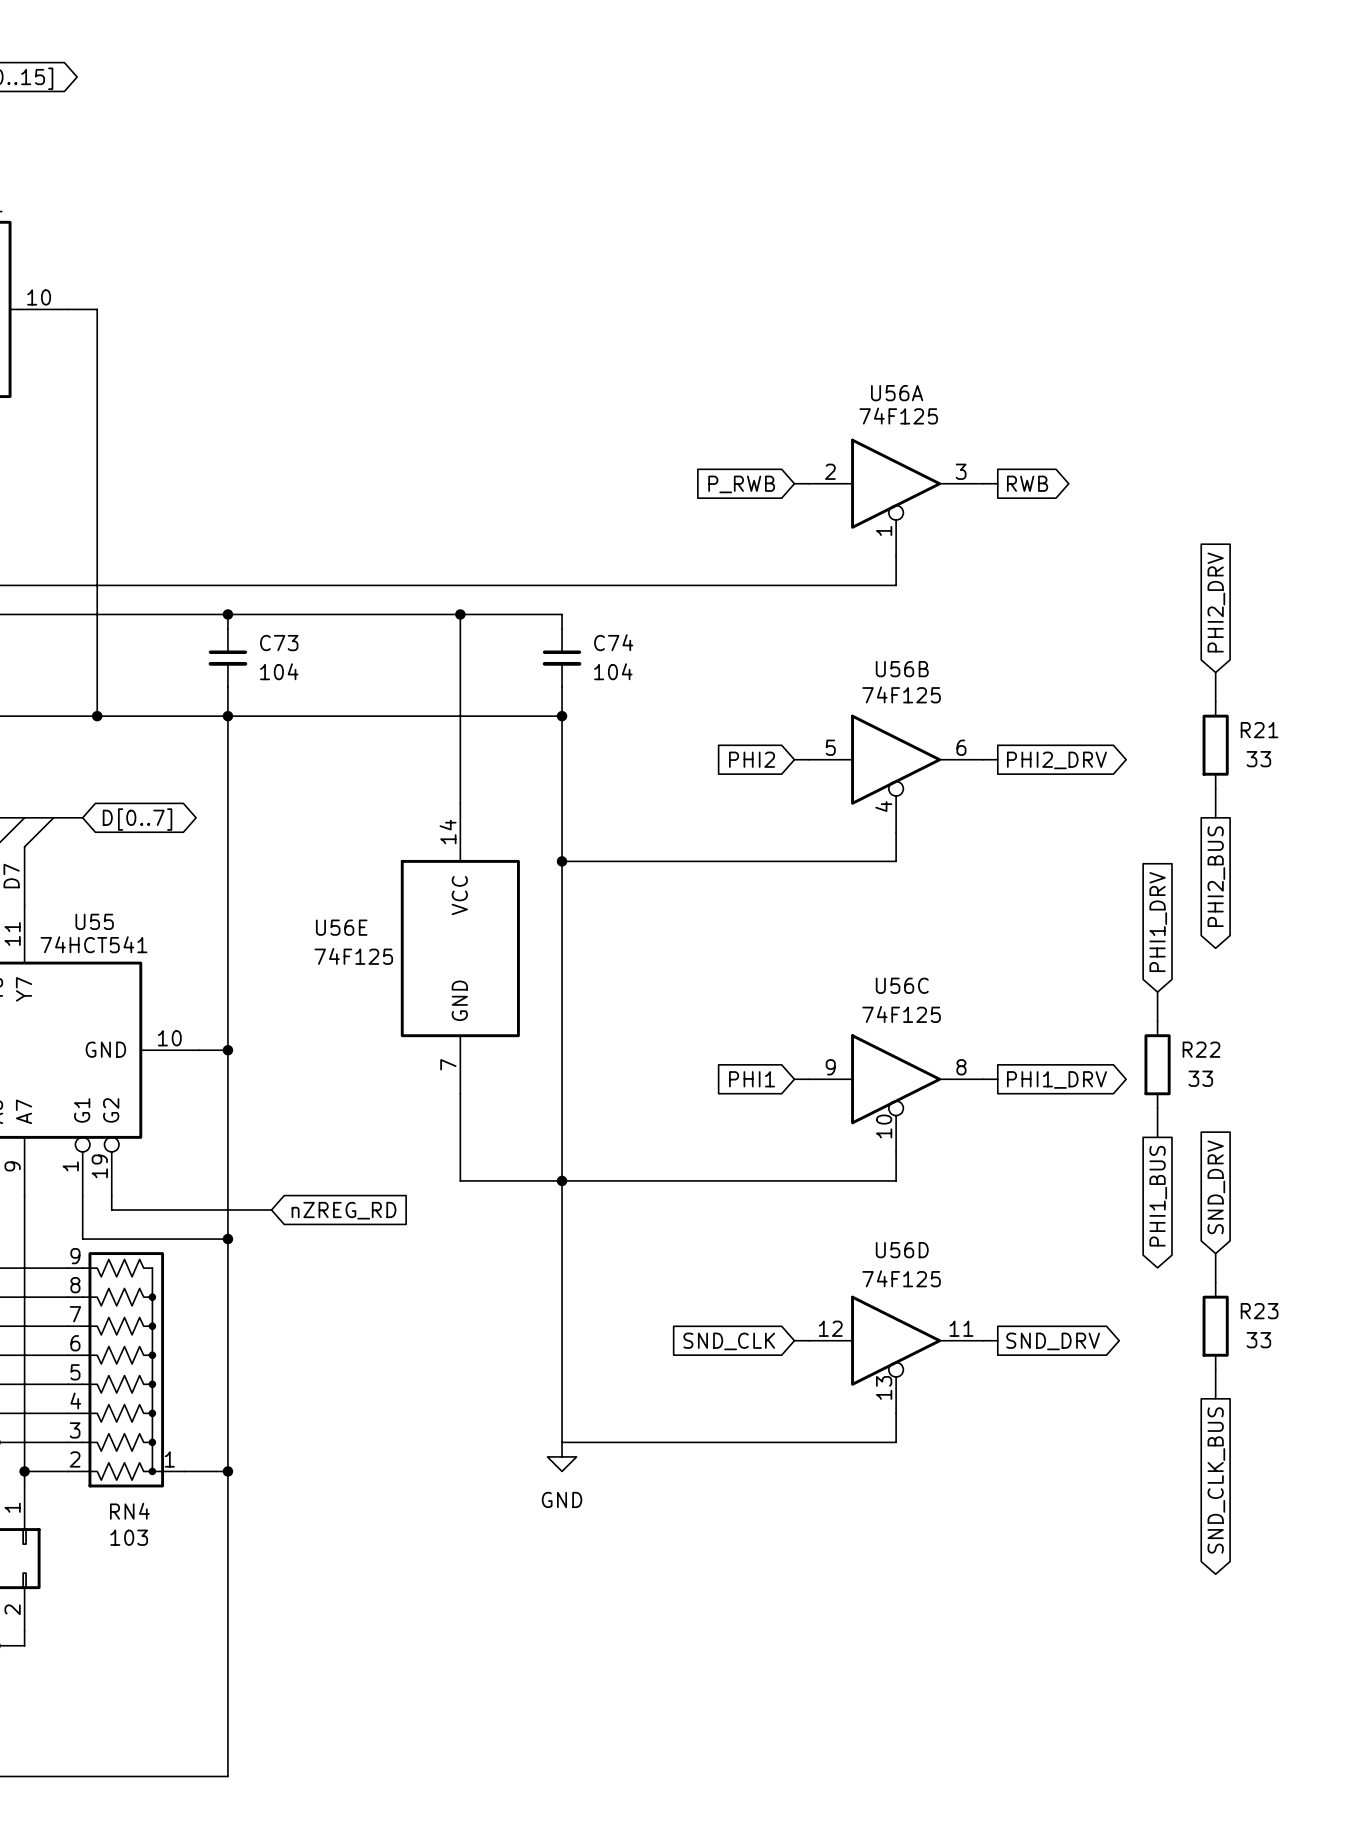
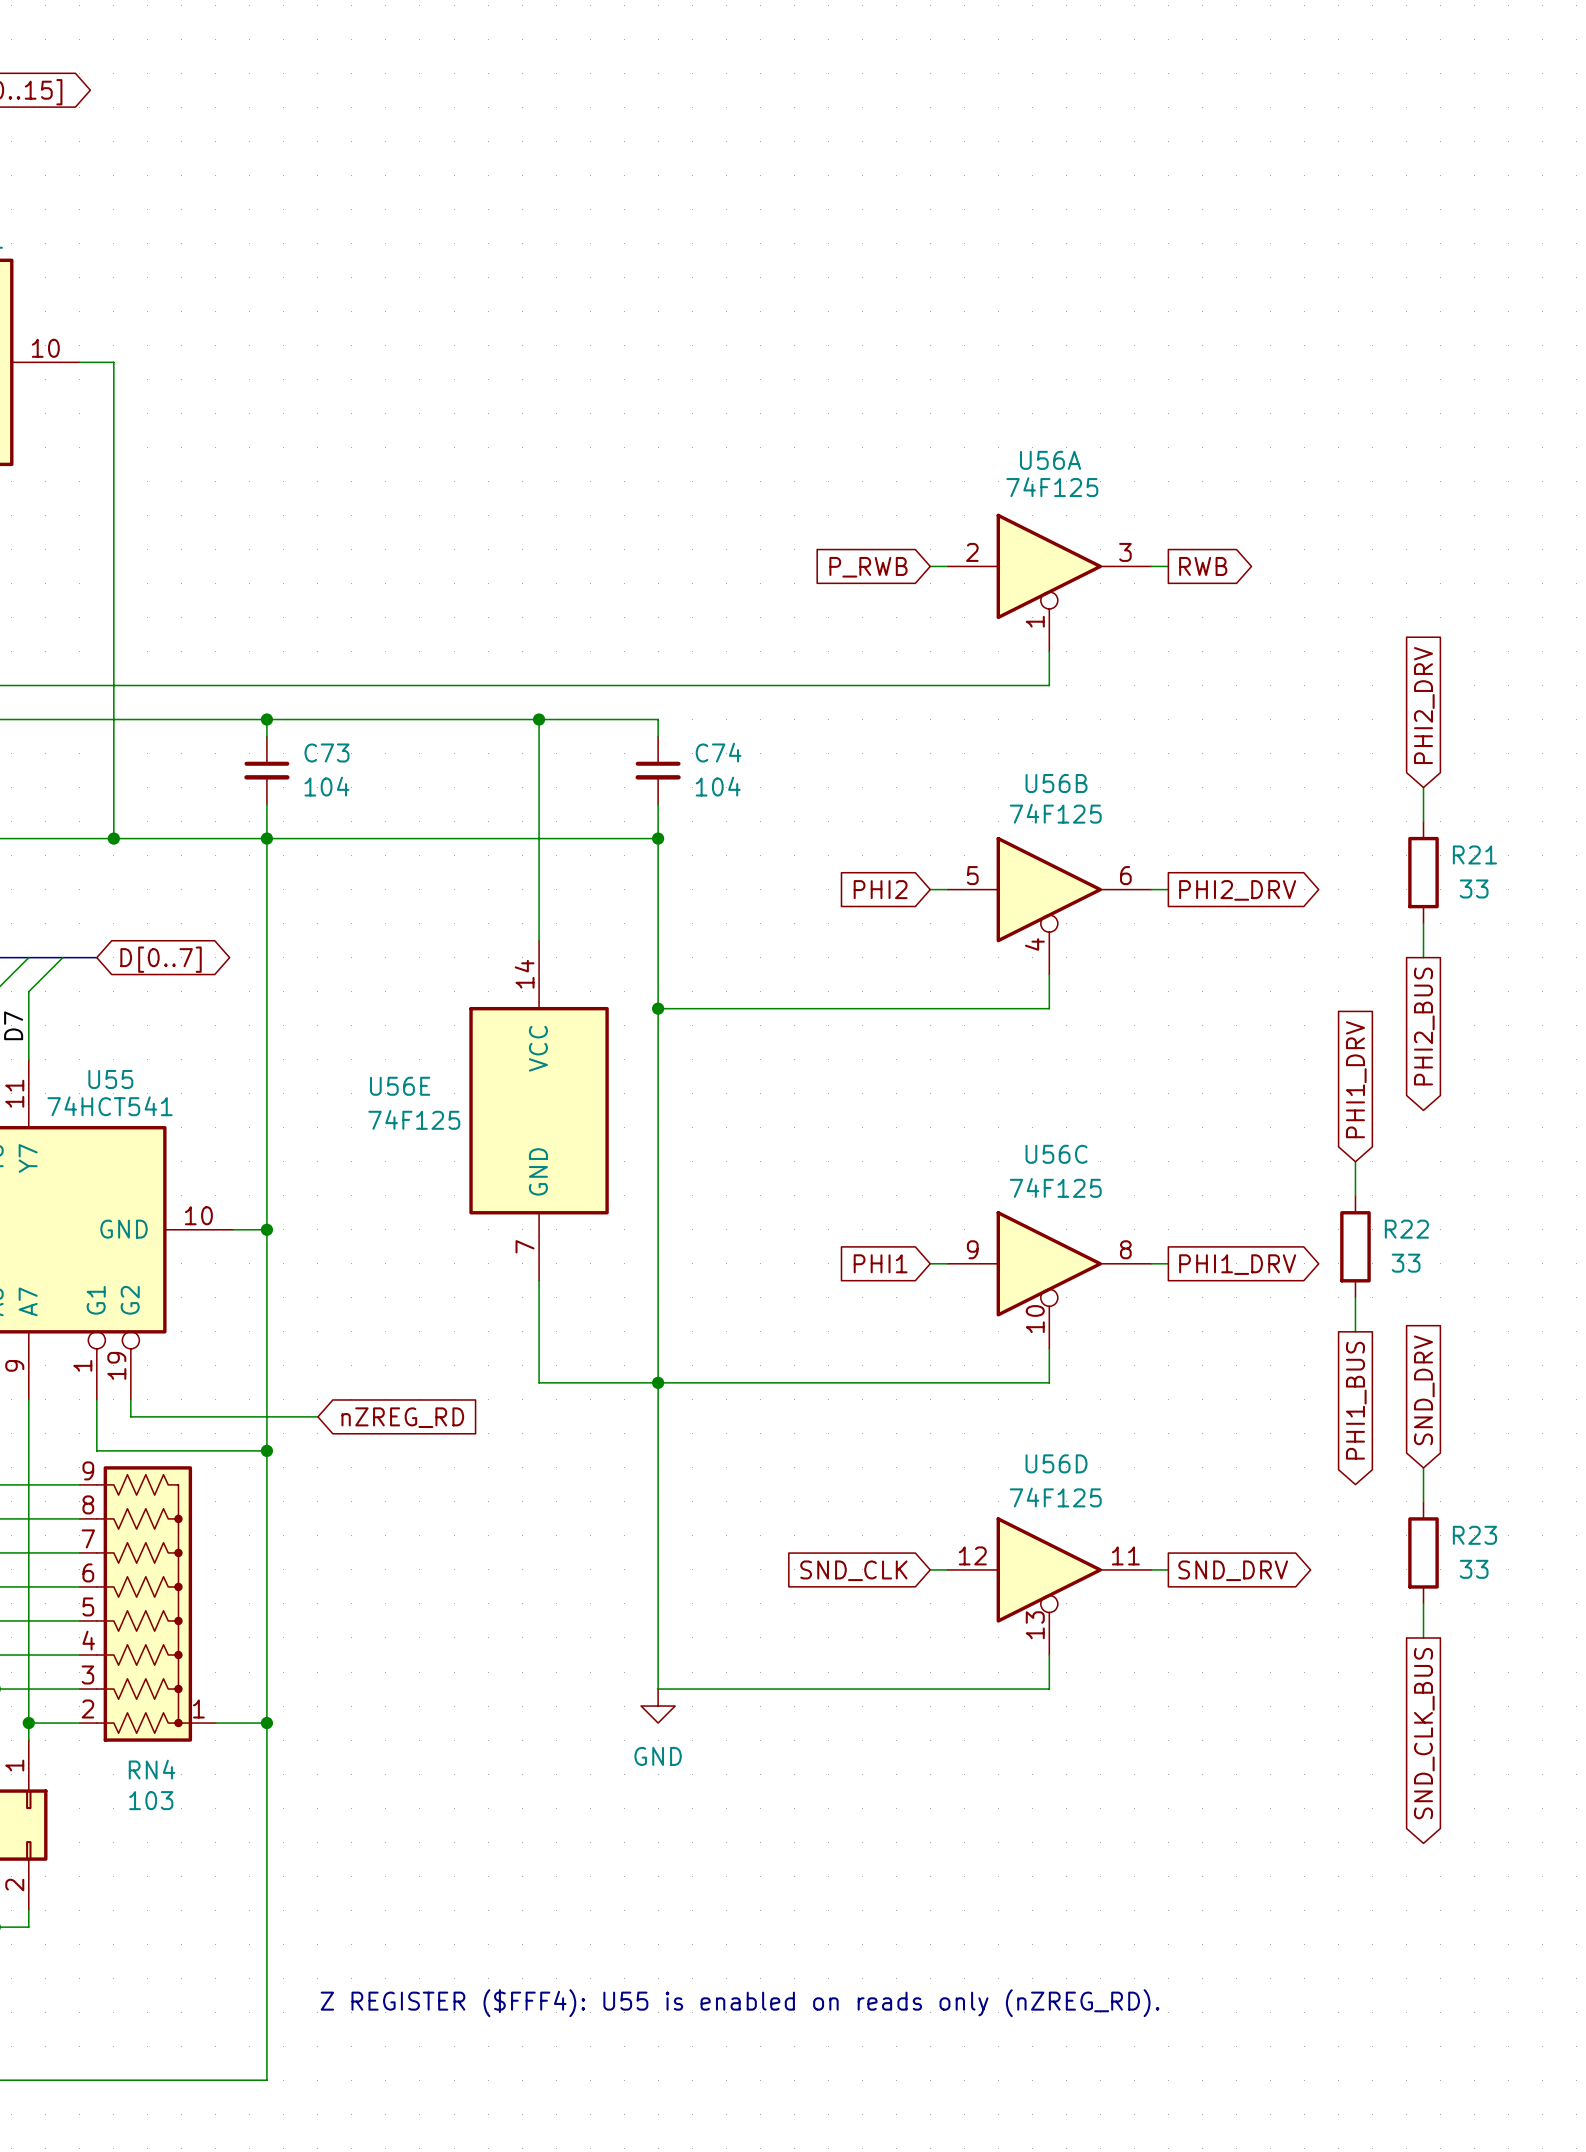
text: none -> Z REGISTER ($FFF4): U55 is enabled on reads only (nZREG_RD). (740, 2003)

